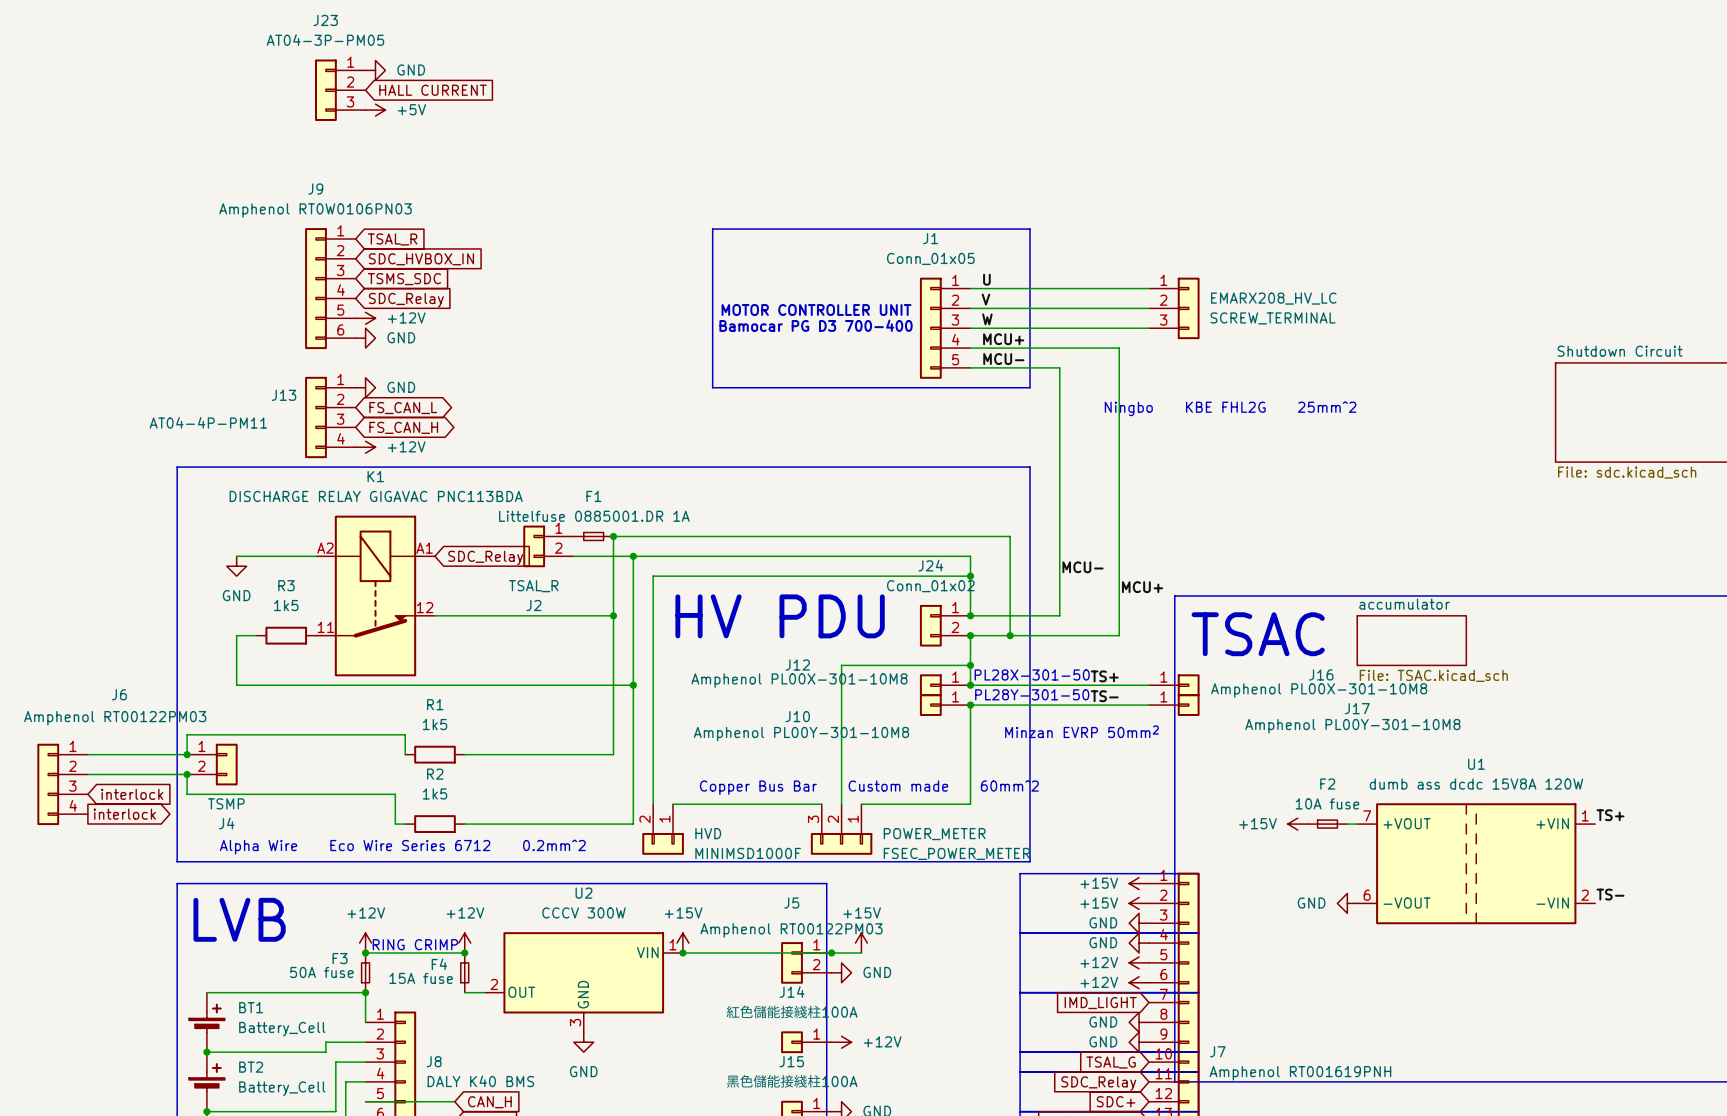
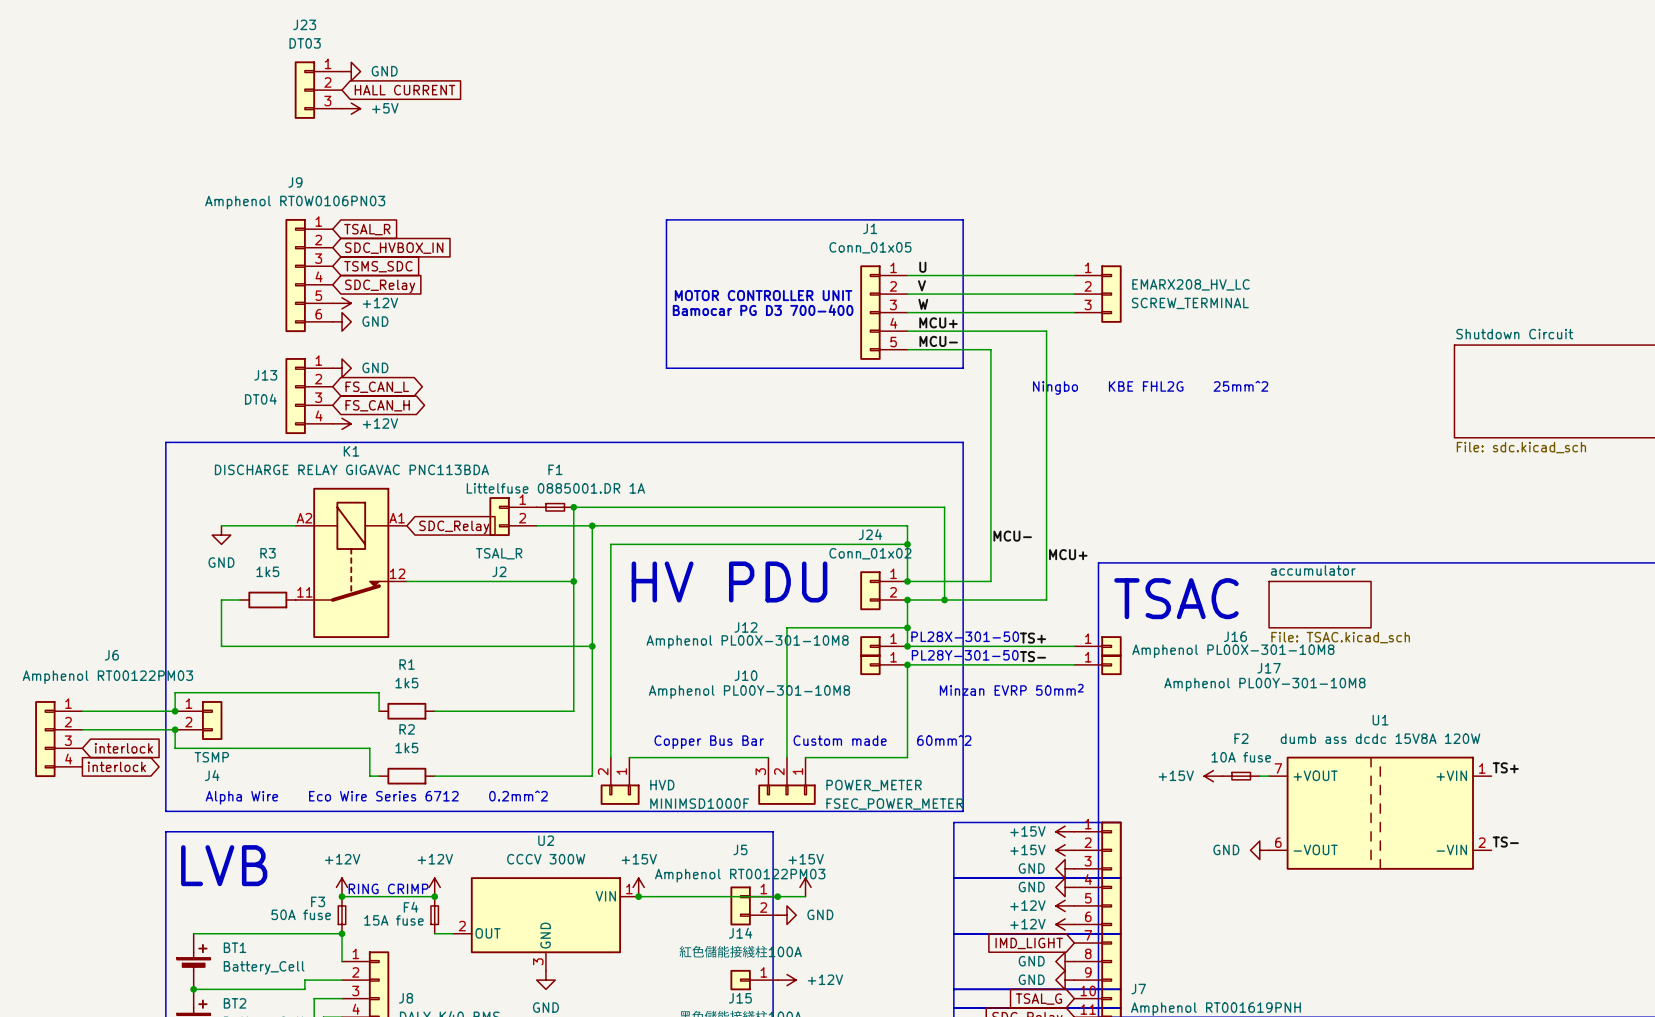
J23 value: AT04-3P-PM05 (325, 40) -> DT03 (305, 43)
J13 value: AT04-4P-PM11 (208, 422) -> DT04 (260, 399)

